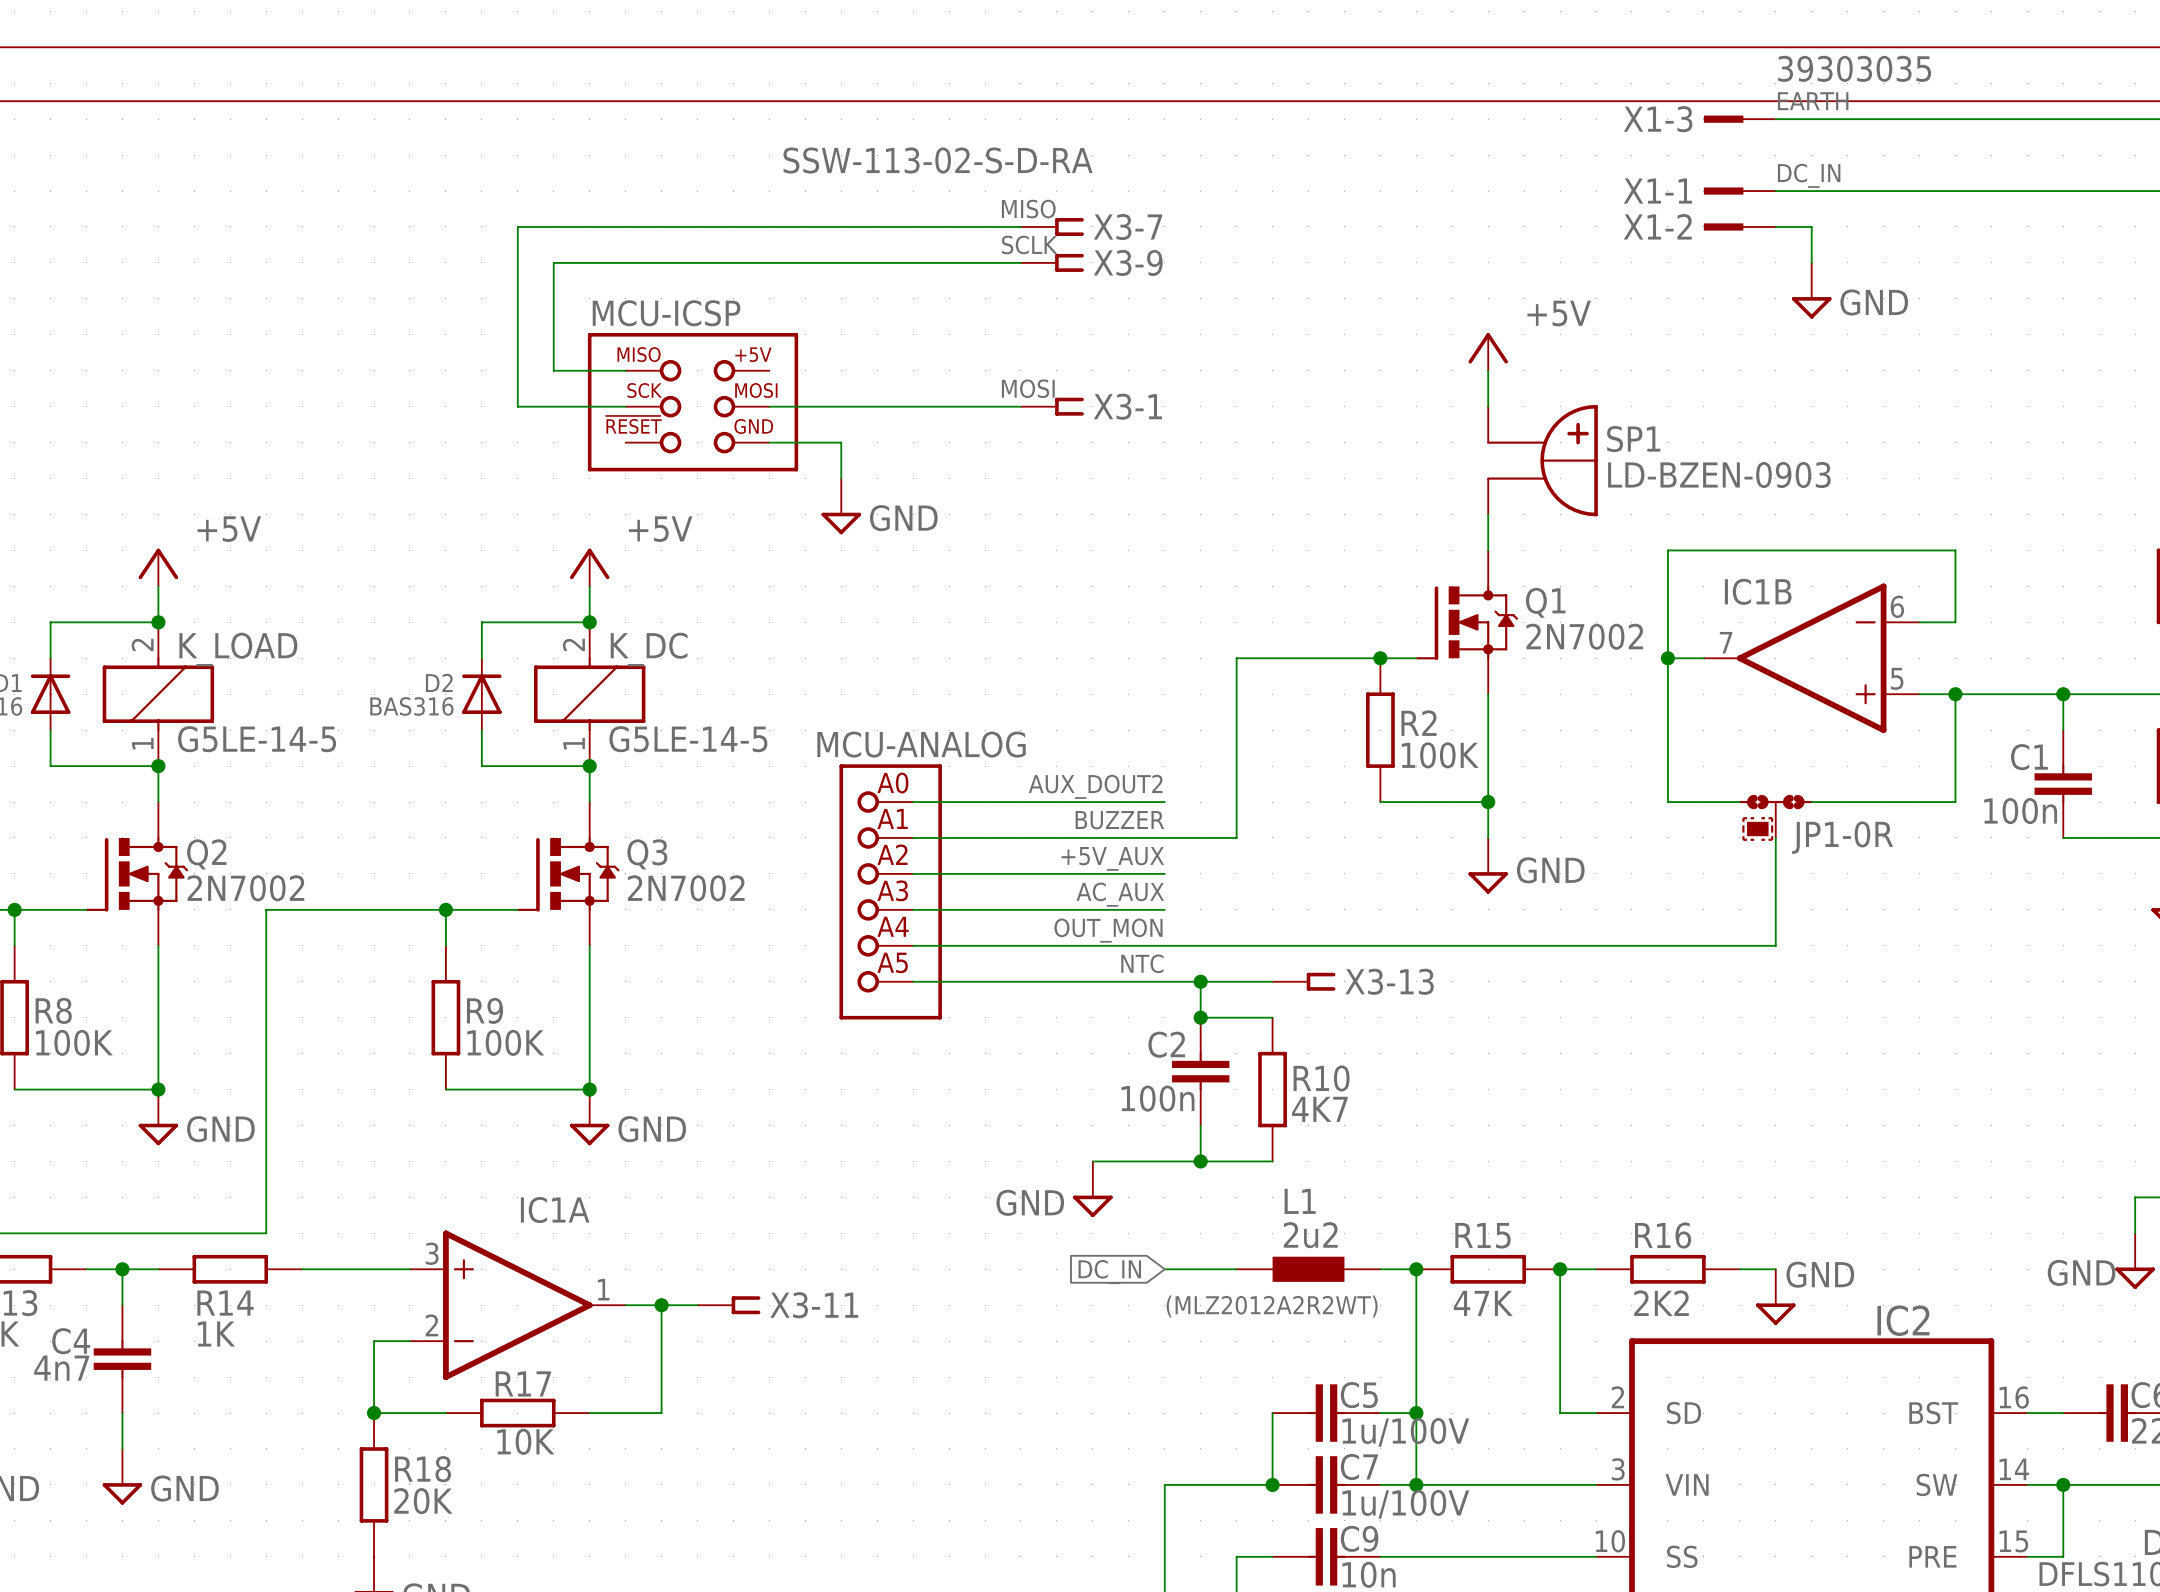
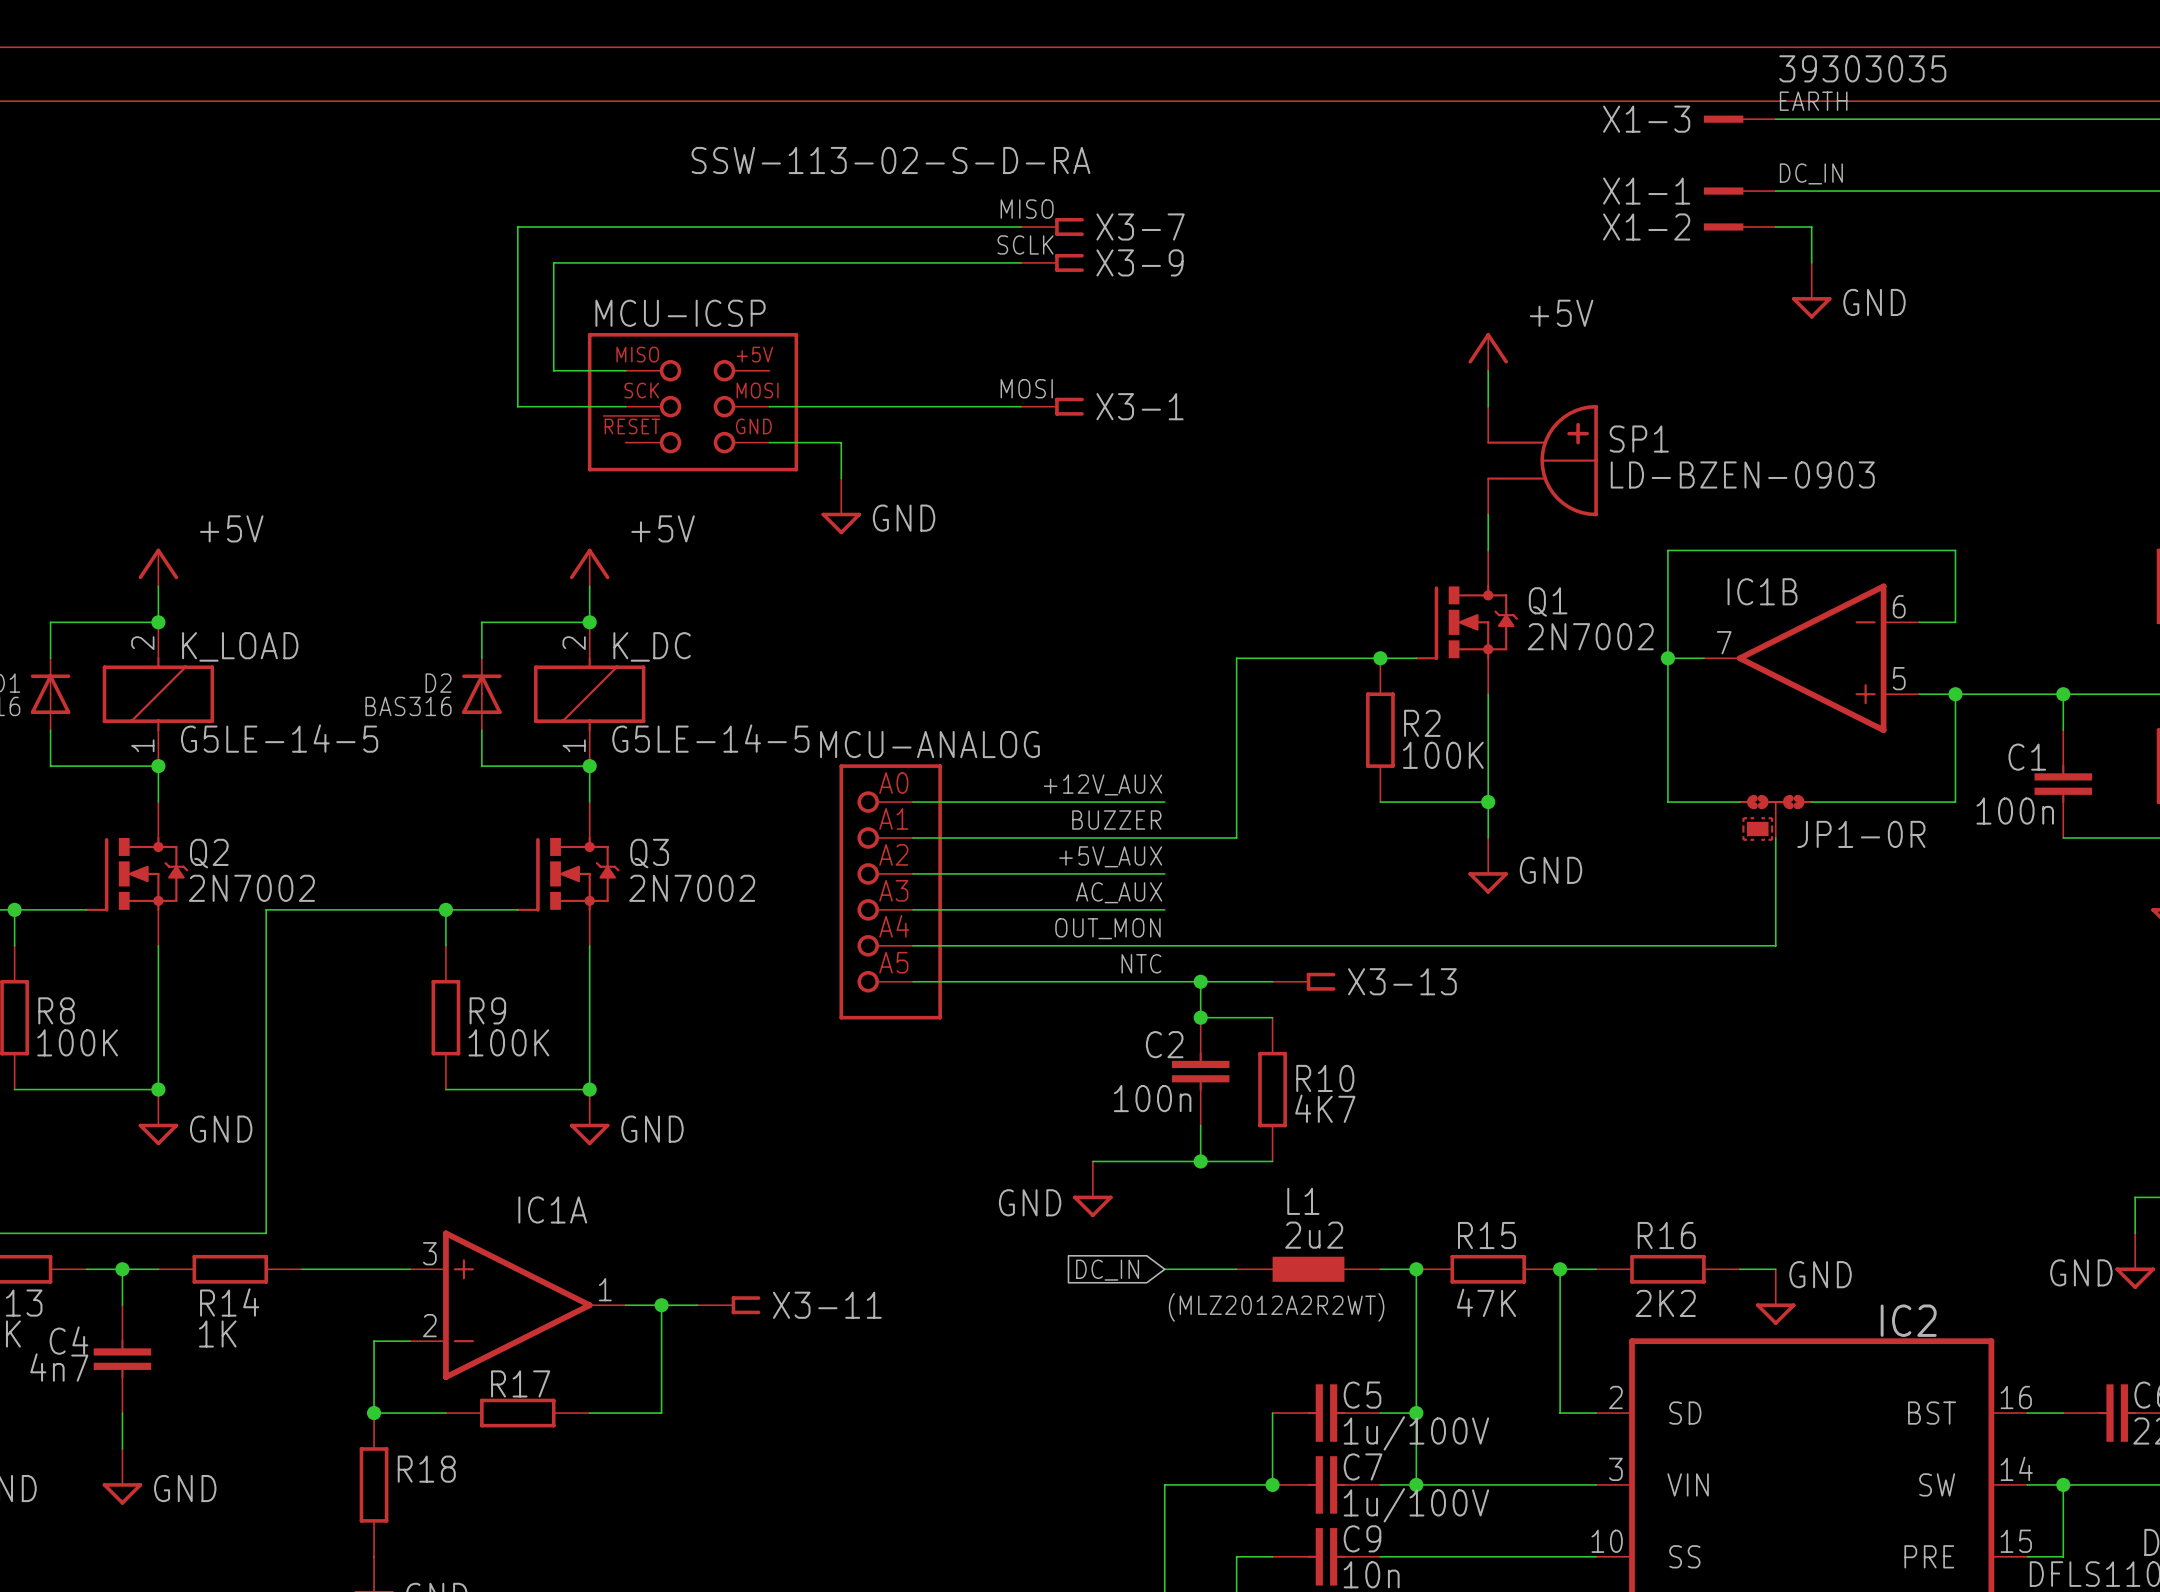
label: AUX_DOUT2 (1095, 786) -> +12V_AUX (1102, 784)
R17 value: 10K (525, 1441) -> none
R18 value: 20K (423, 1501) -> none

